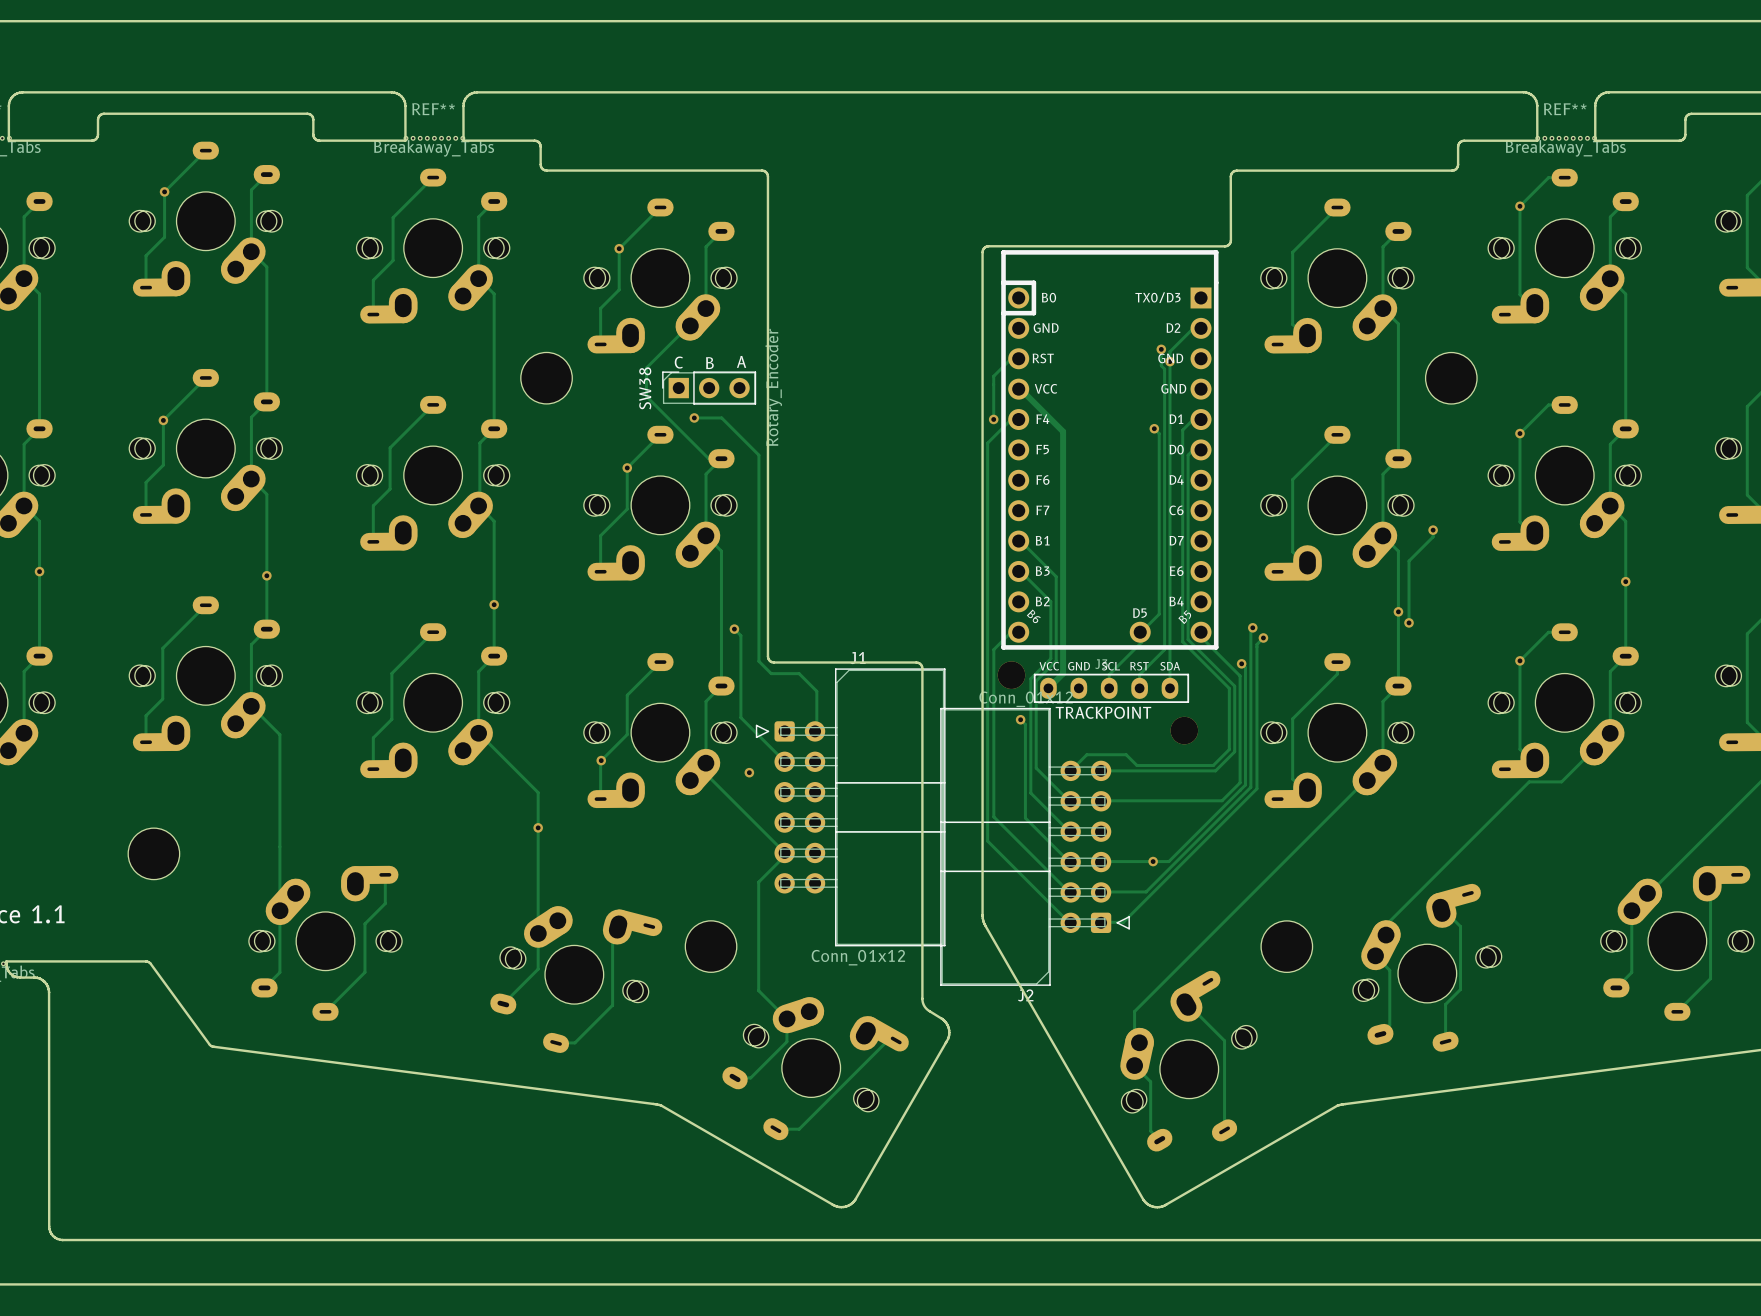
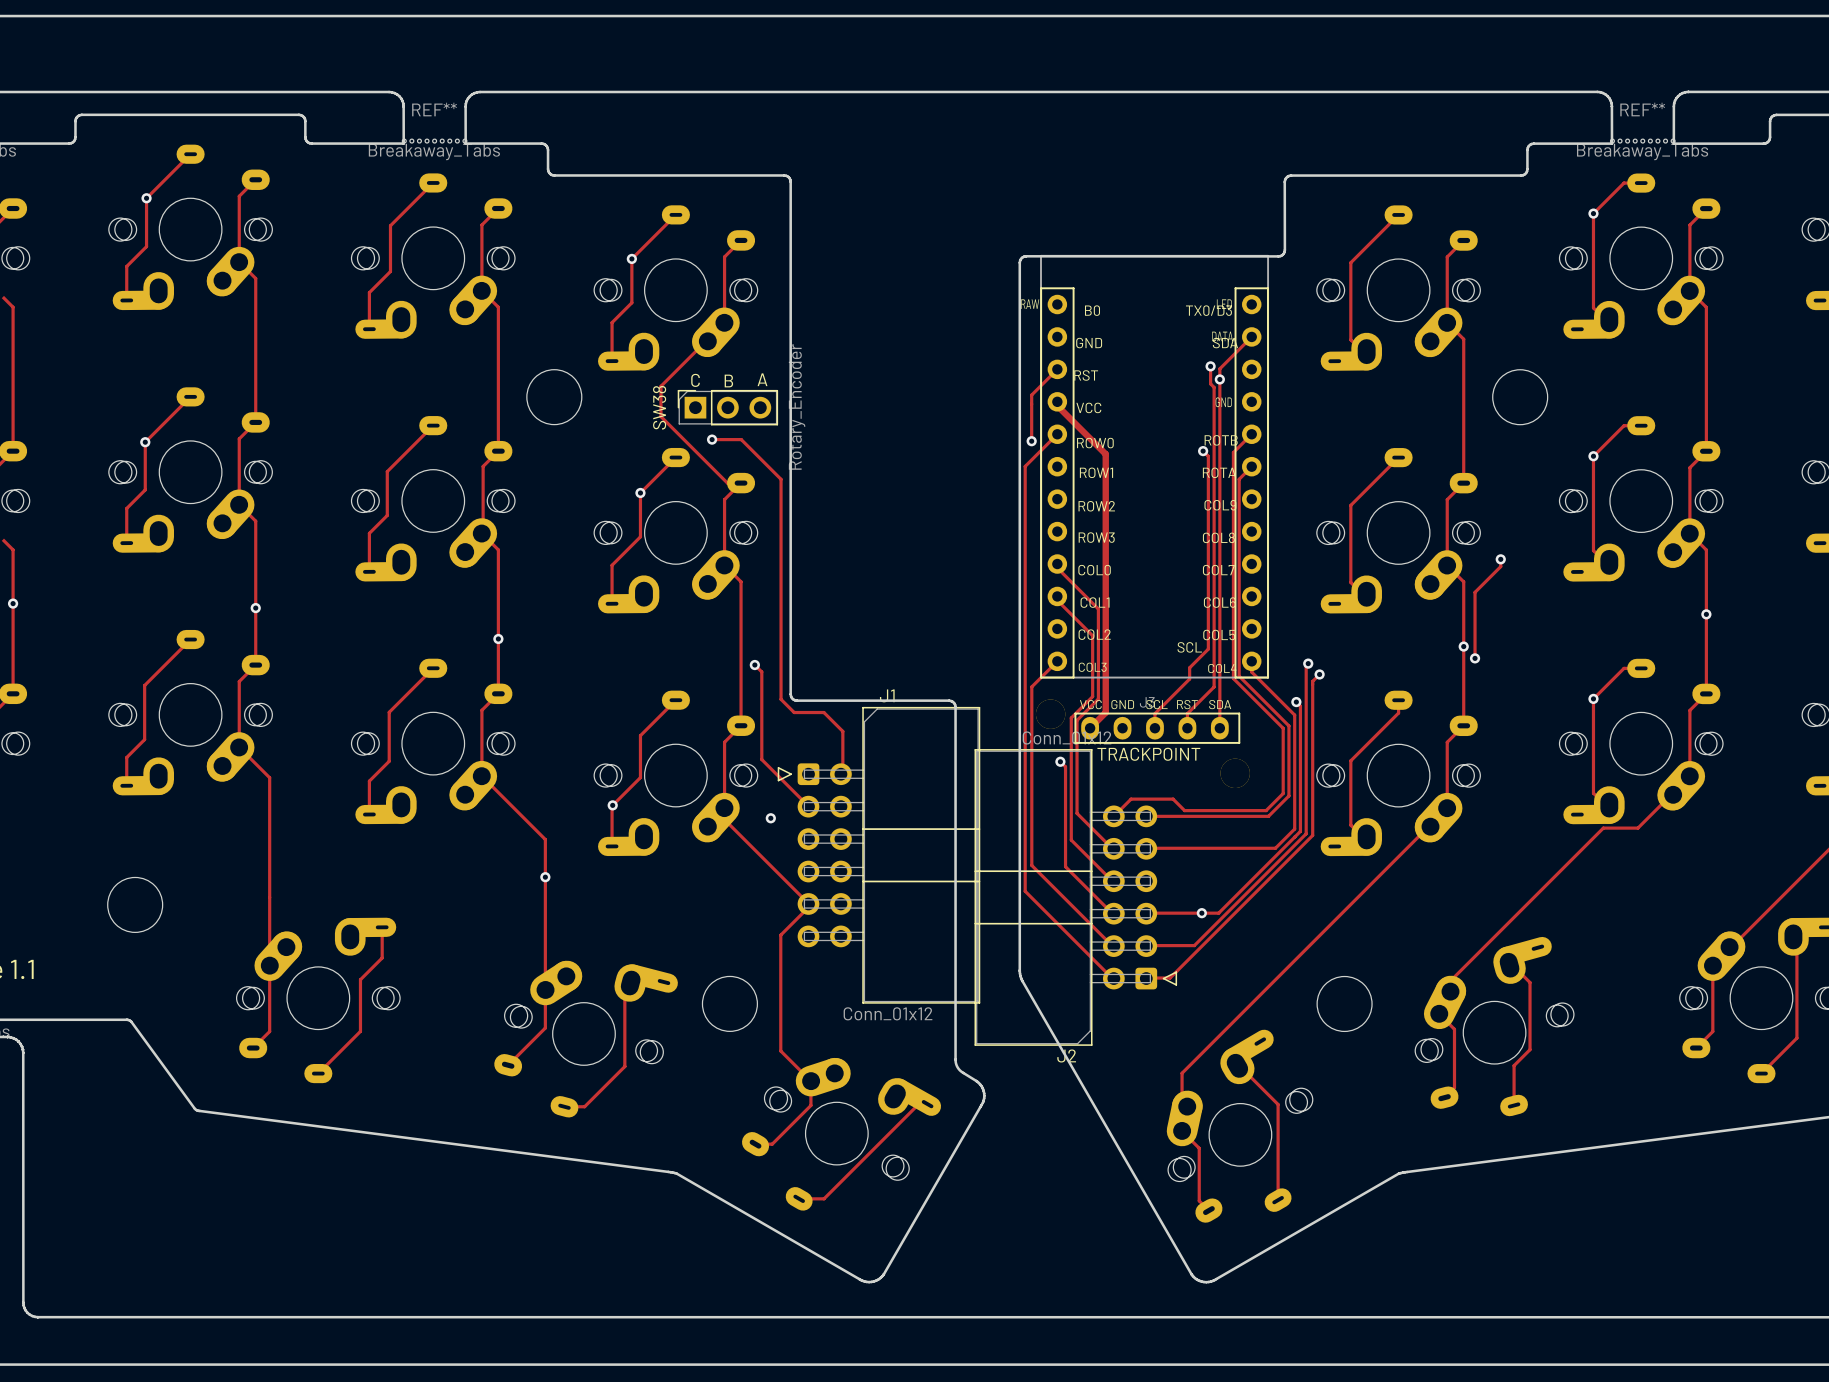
part footprint: [1001, 250, 1219, 650] -> [1040, 254, 1270, 679]

